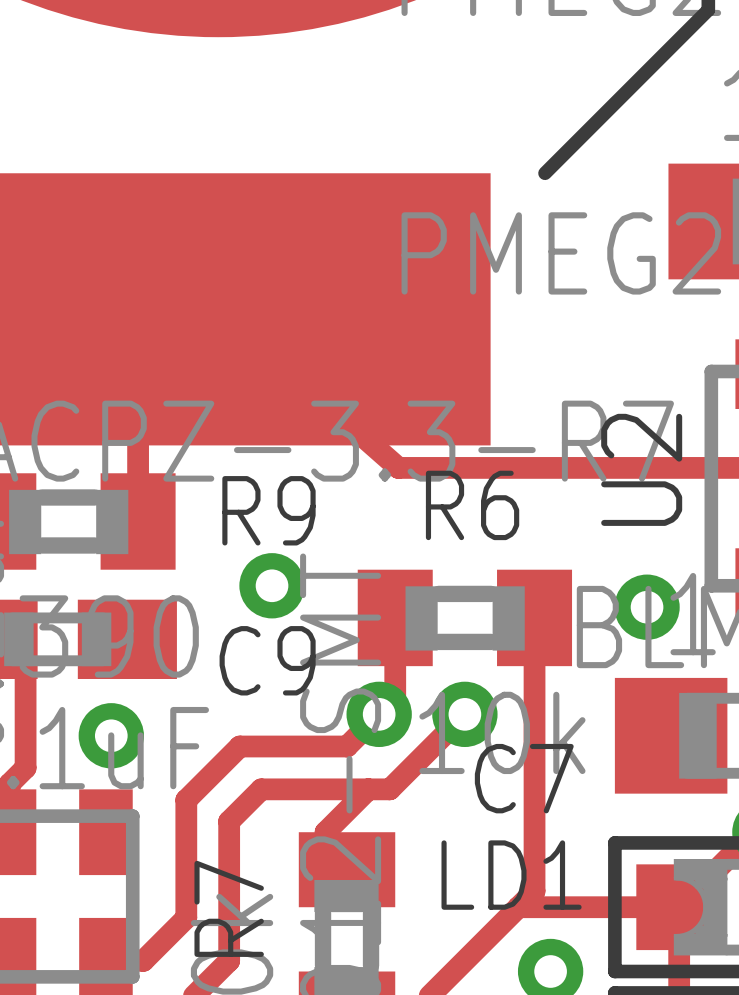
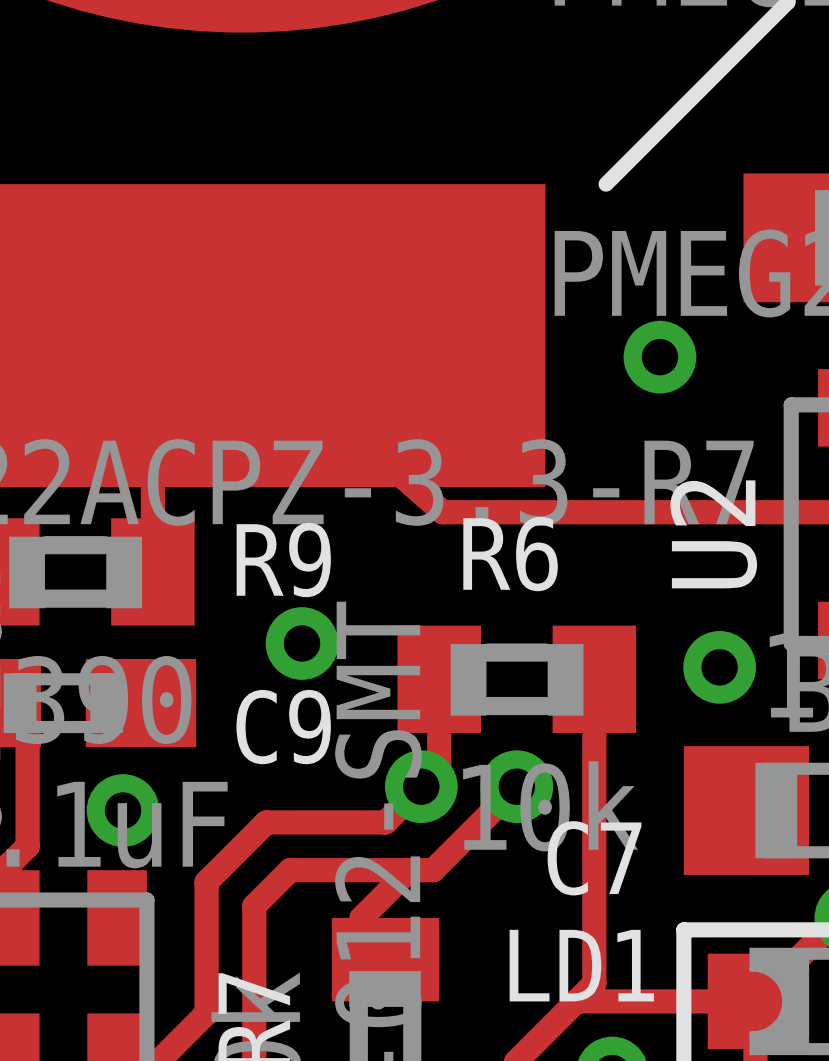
via: none -> (659, 357)

